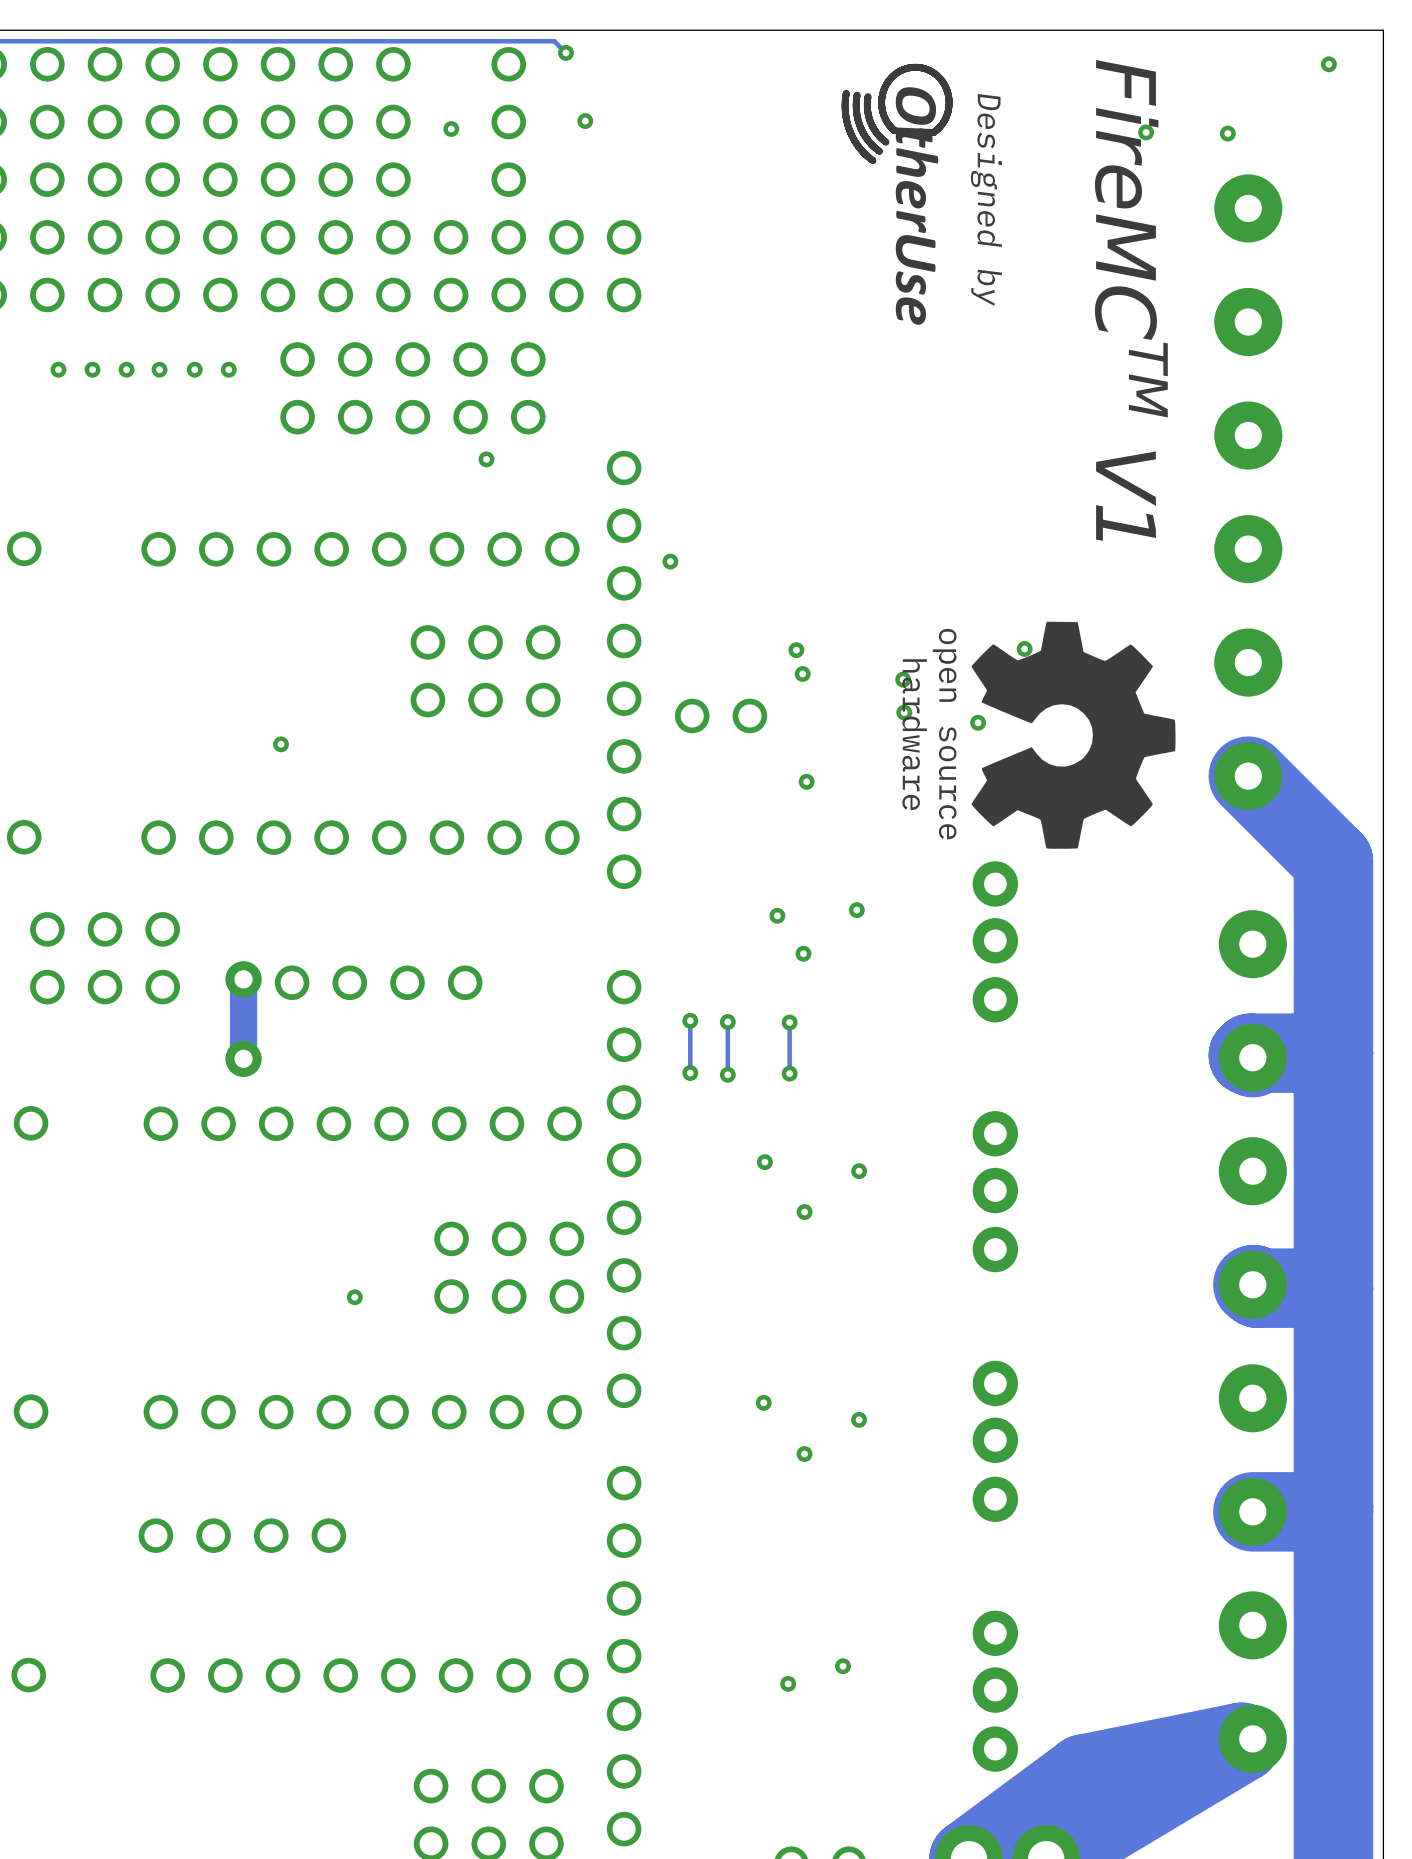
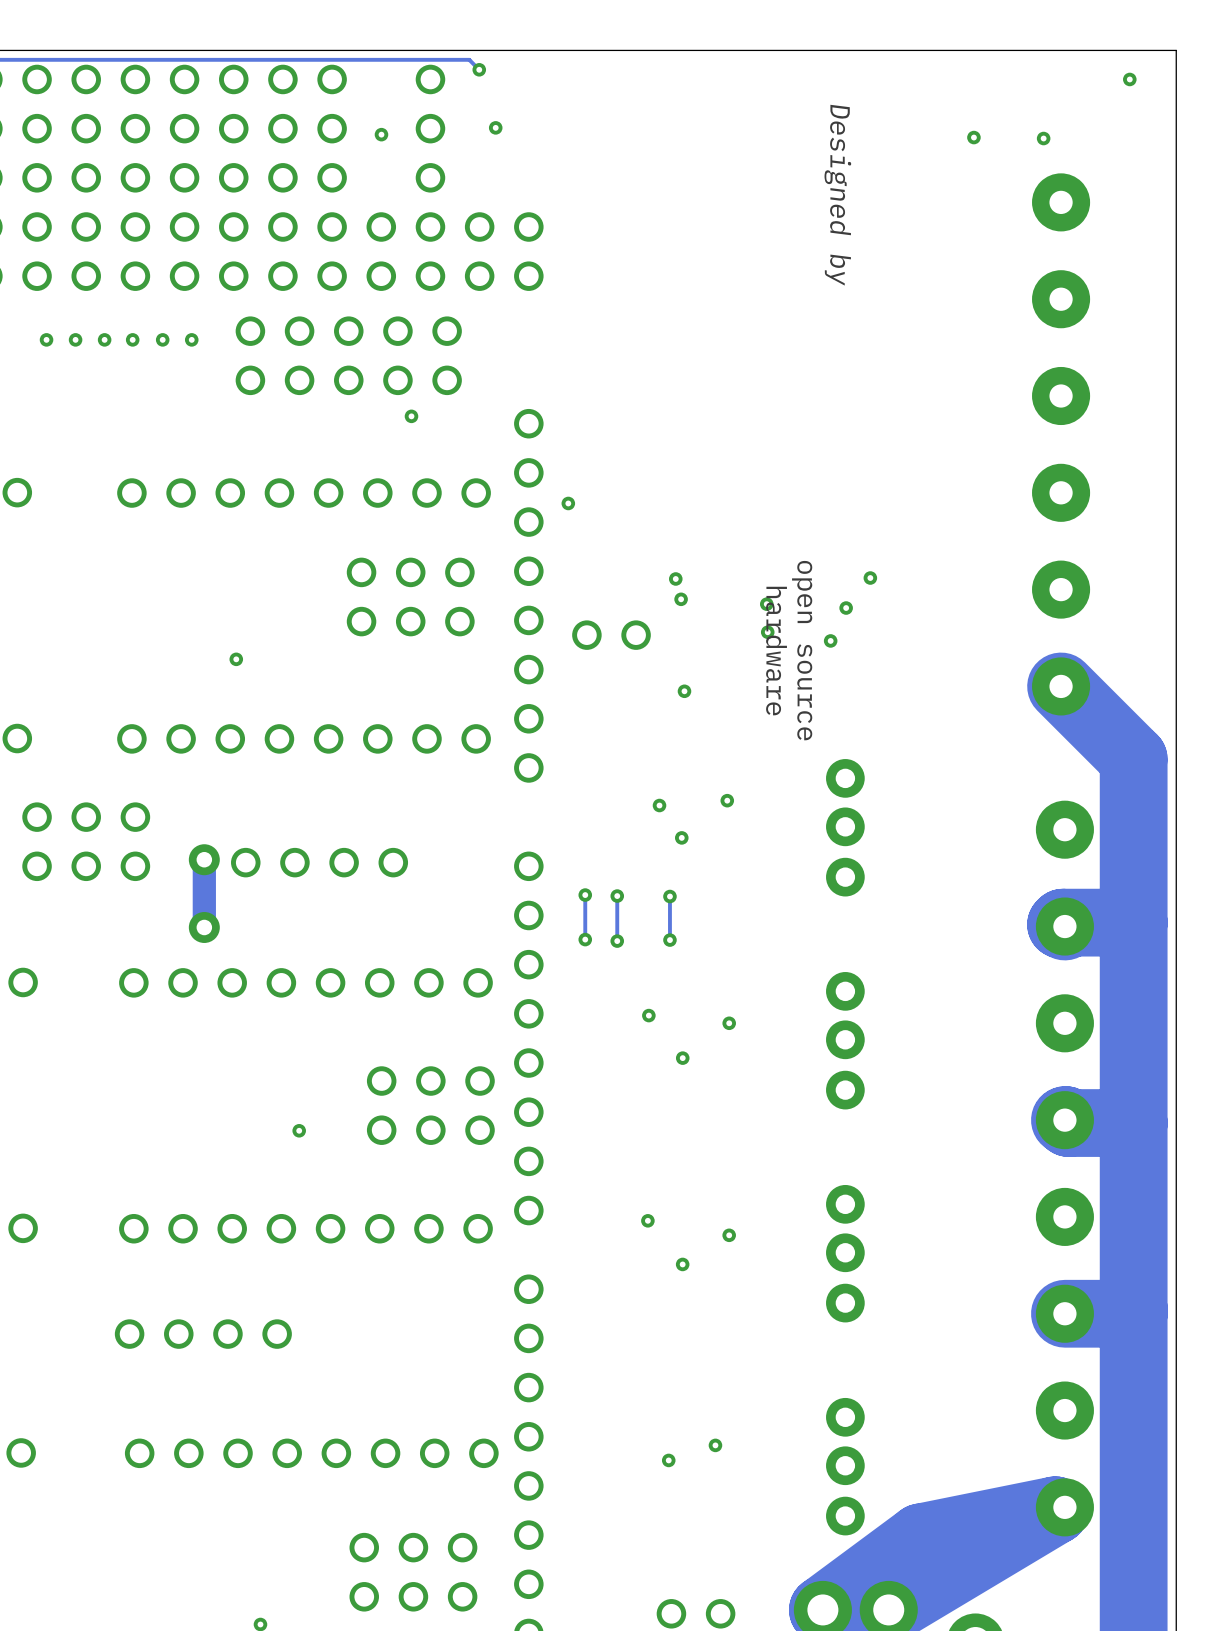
drawing: [1094, 60, 1168, 541] -> none
drawing: [841, 63, 953, 325] -> none
drawing: [971, 621, 1176, 849] -> none

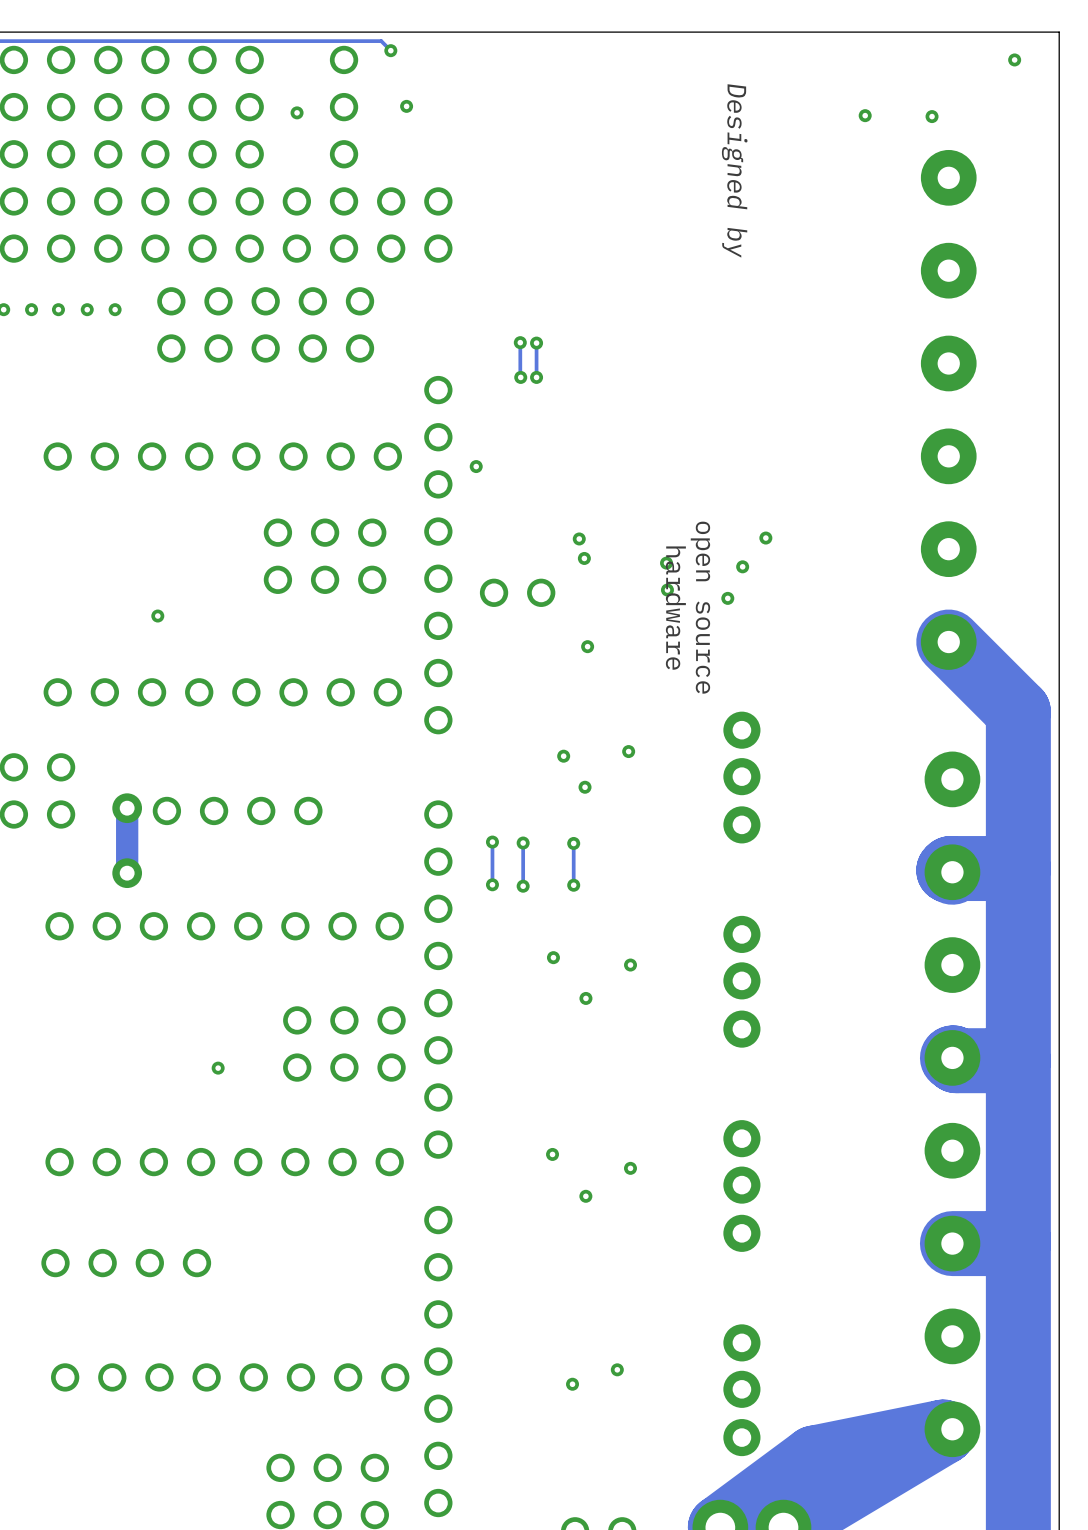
track: none -> (520, 342) (520, 377)
via: none -> (520, 342)
track: none -> (536, 343) (536, 377)
via: none -> (536, 343)
via: none -> (520, 377)
via: none -> (536, 377)
via: (411, 416) -> none

